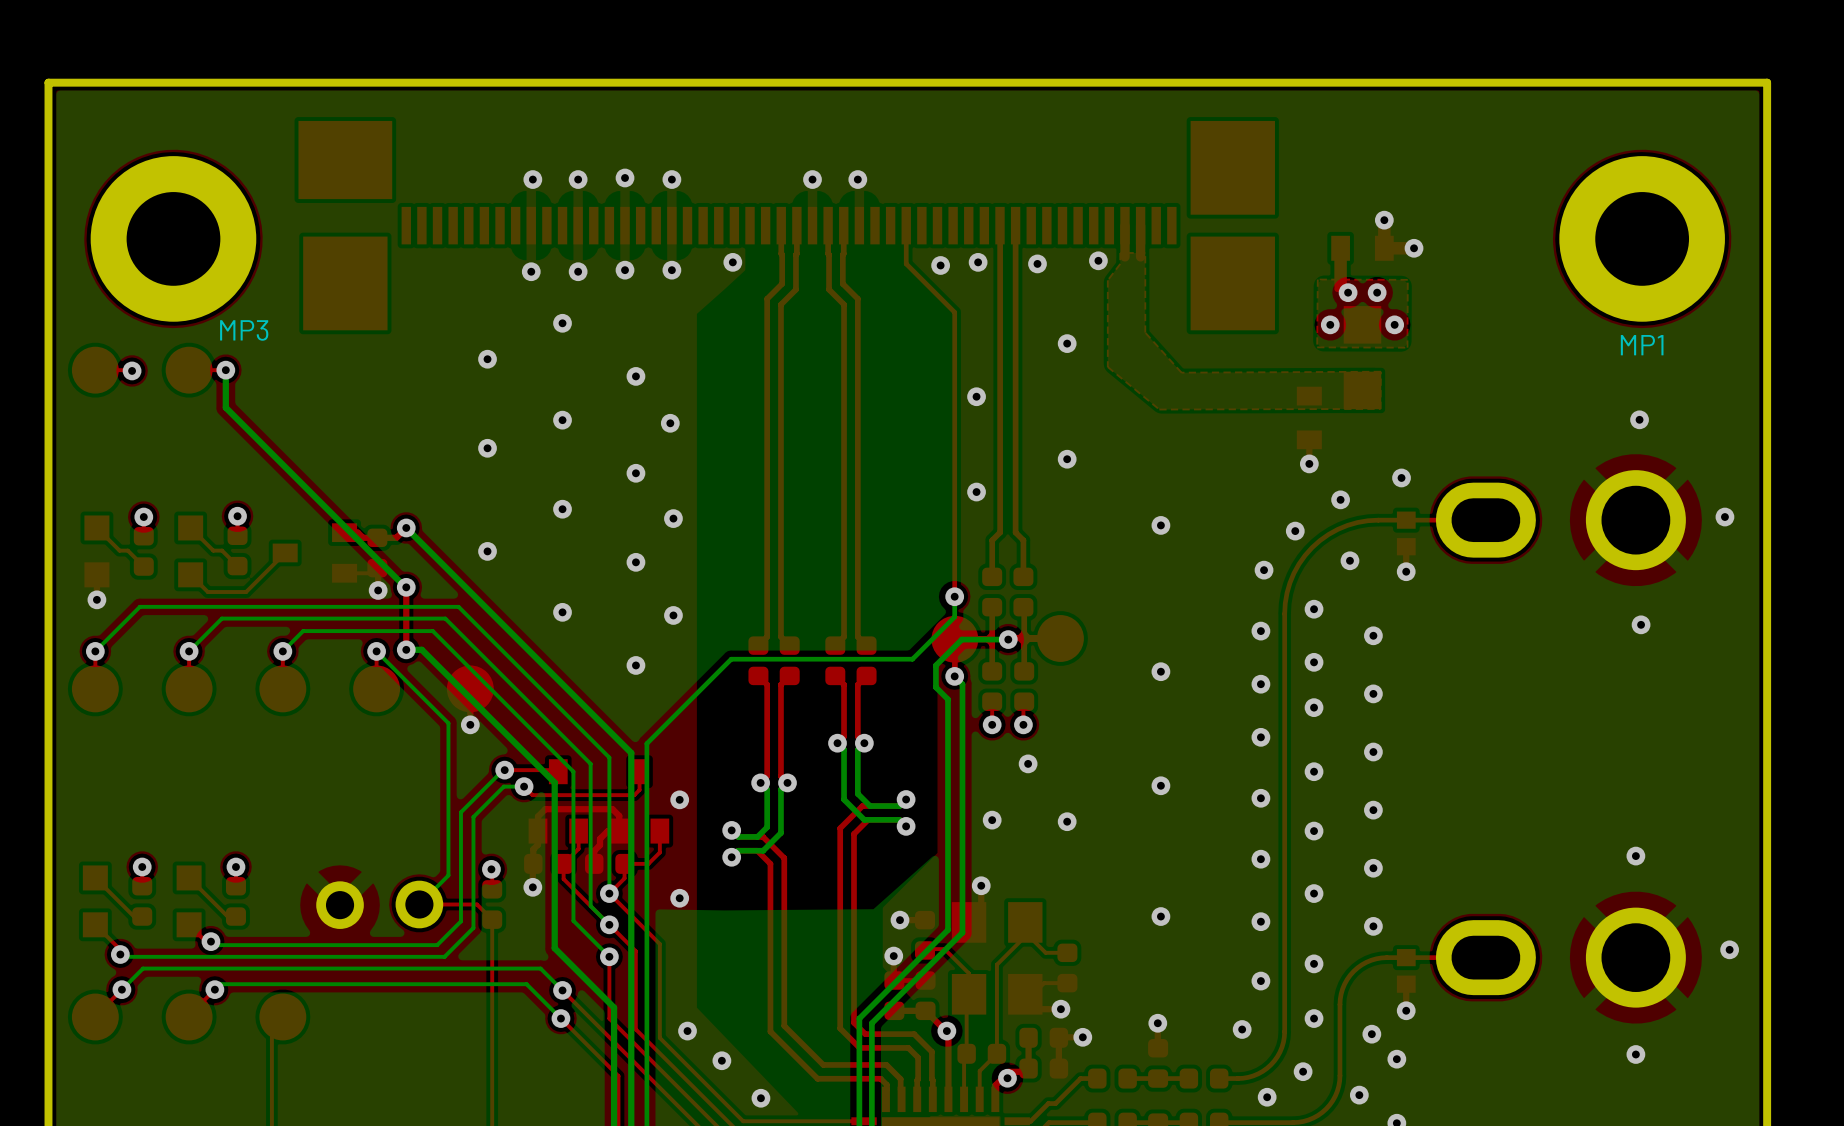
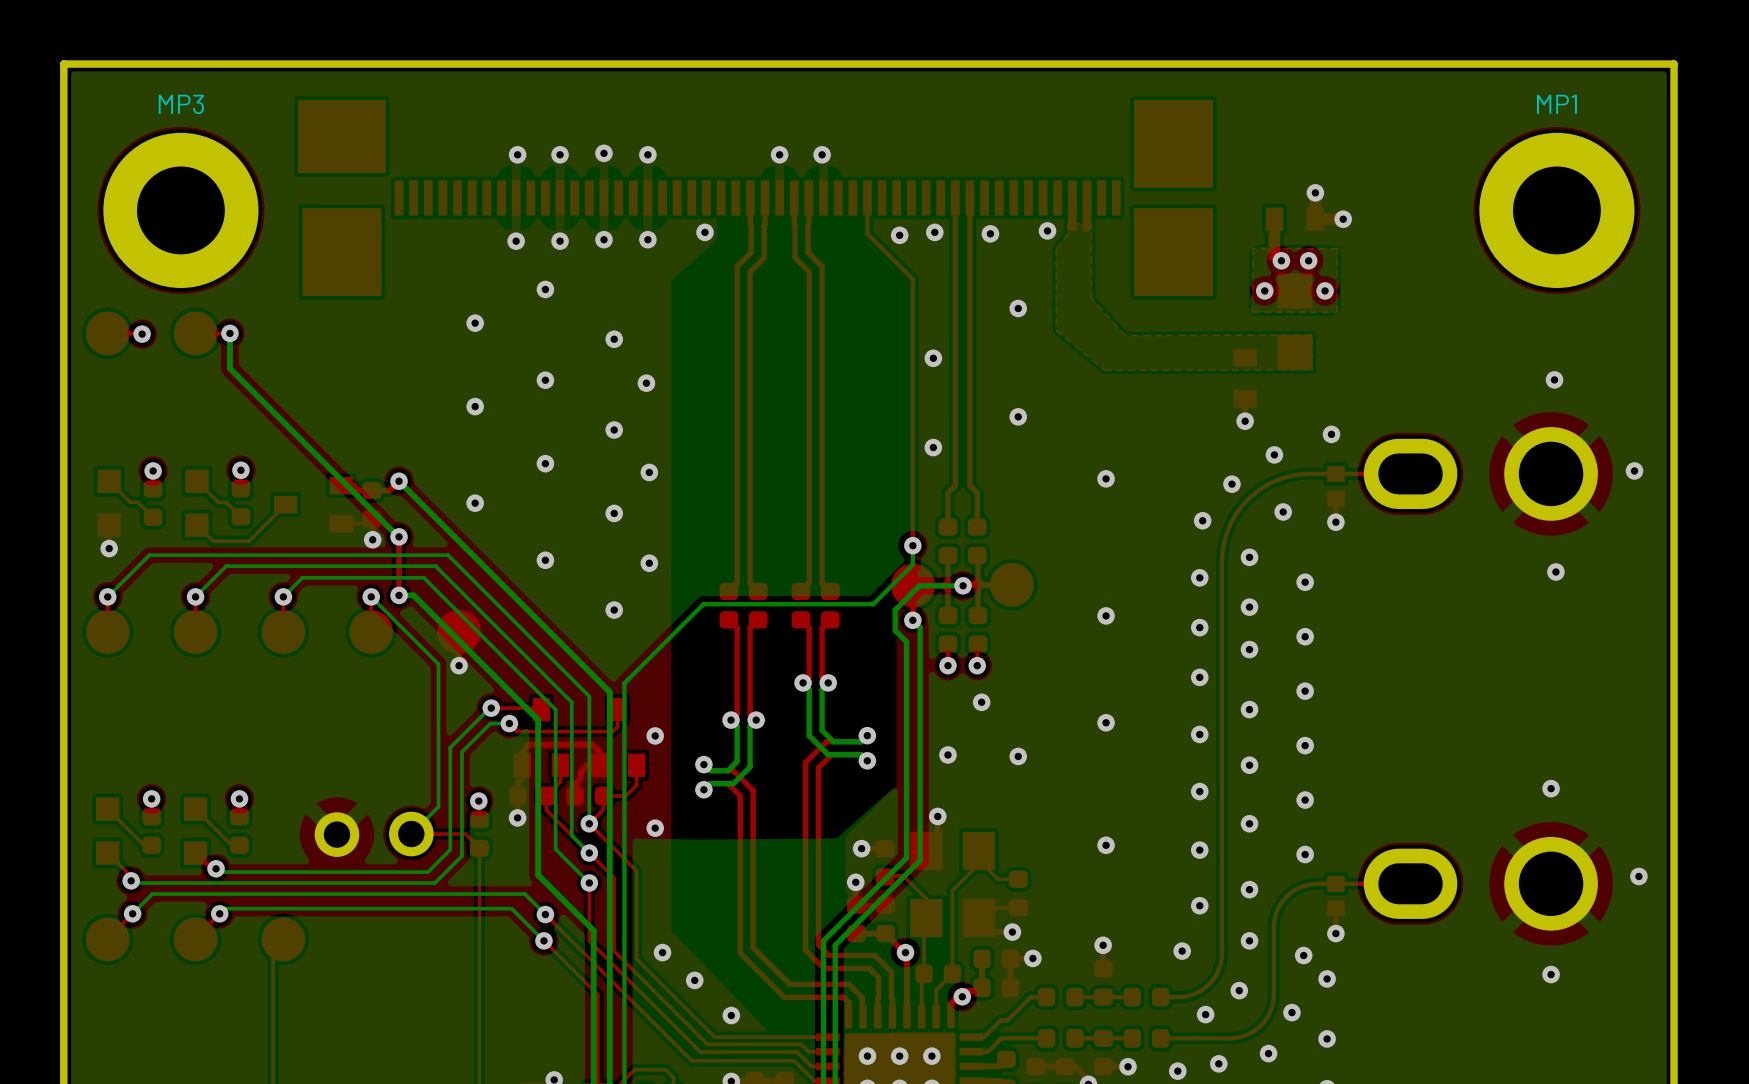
MP3 name position: MP3 (244, 330) -> MP3 (181, 104)
MP1 name position: MP1 (1642, 345) -> MP1 (1556, 104)

